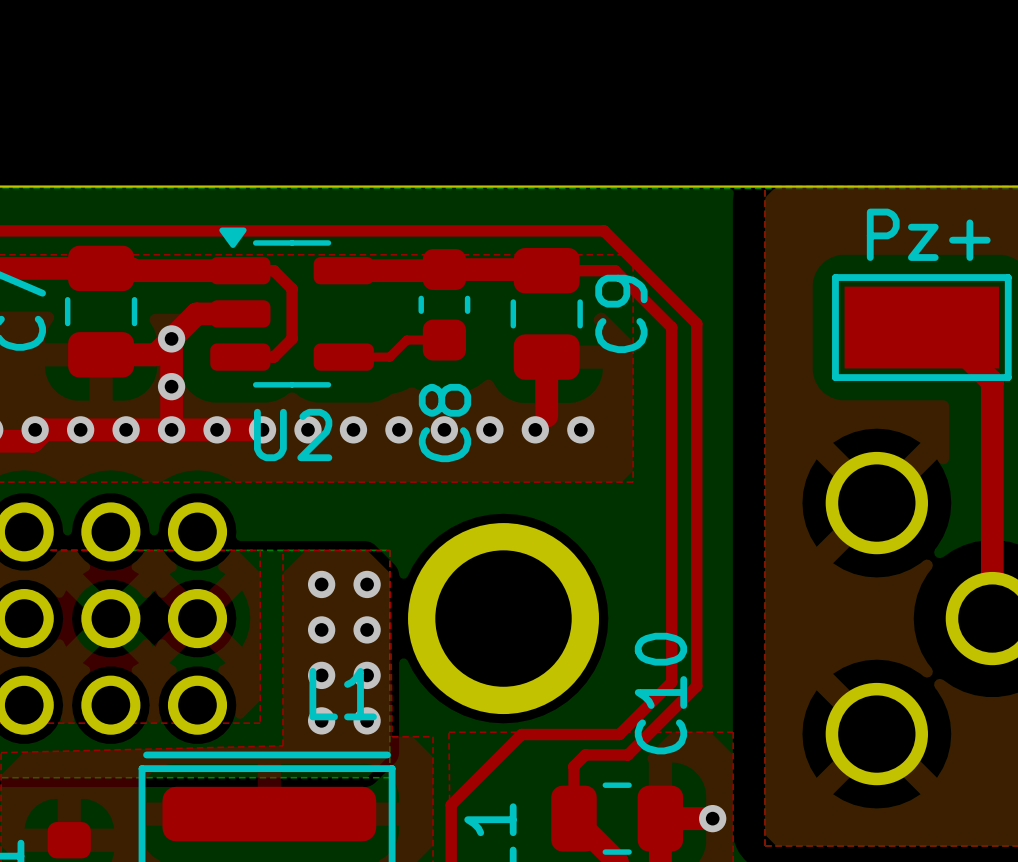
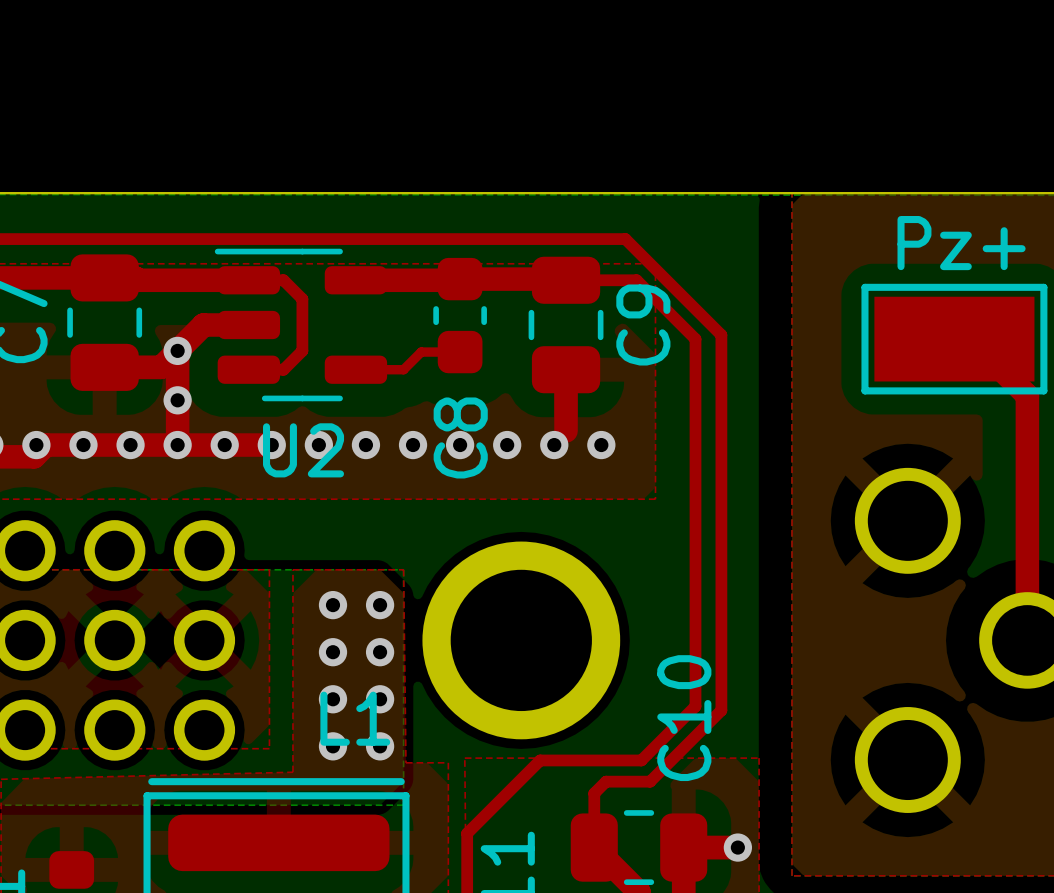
U2 footprint: [210, 227, 374, 388] -> [214, 248, 388, 402]

